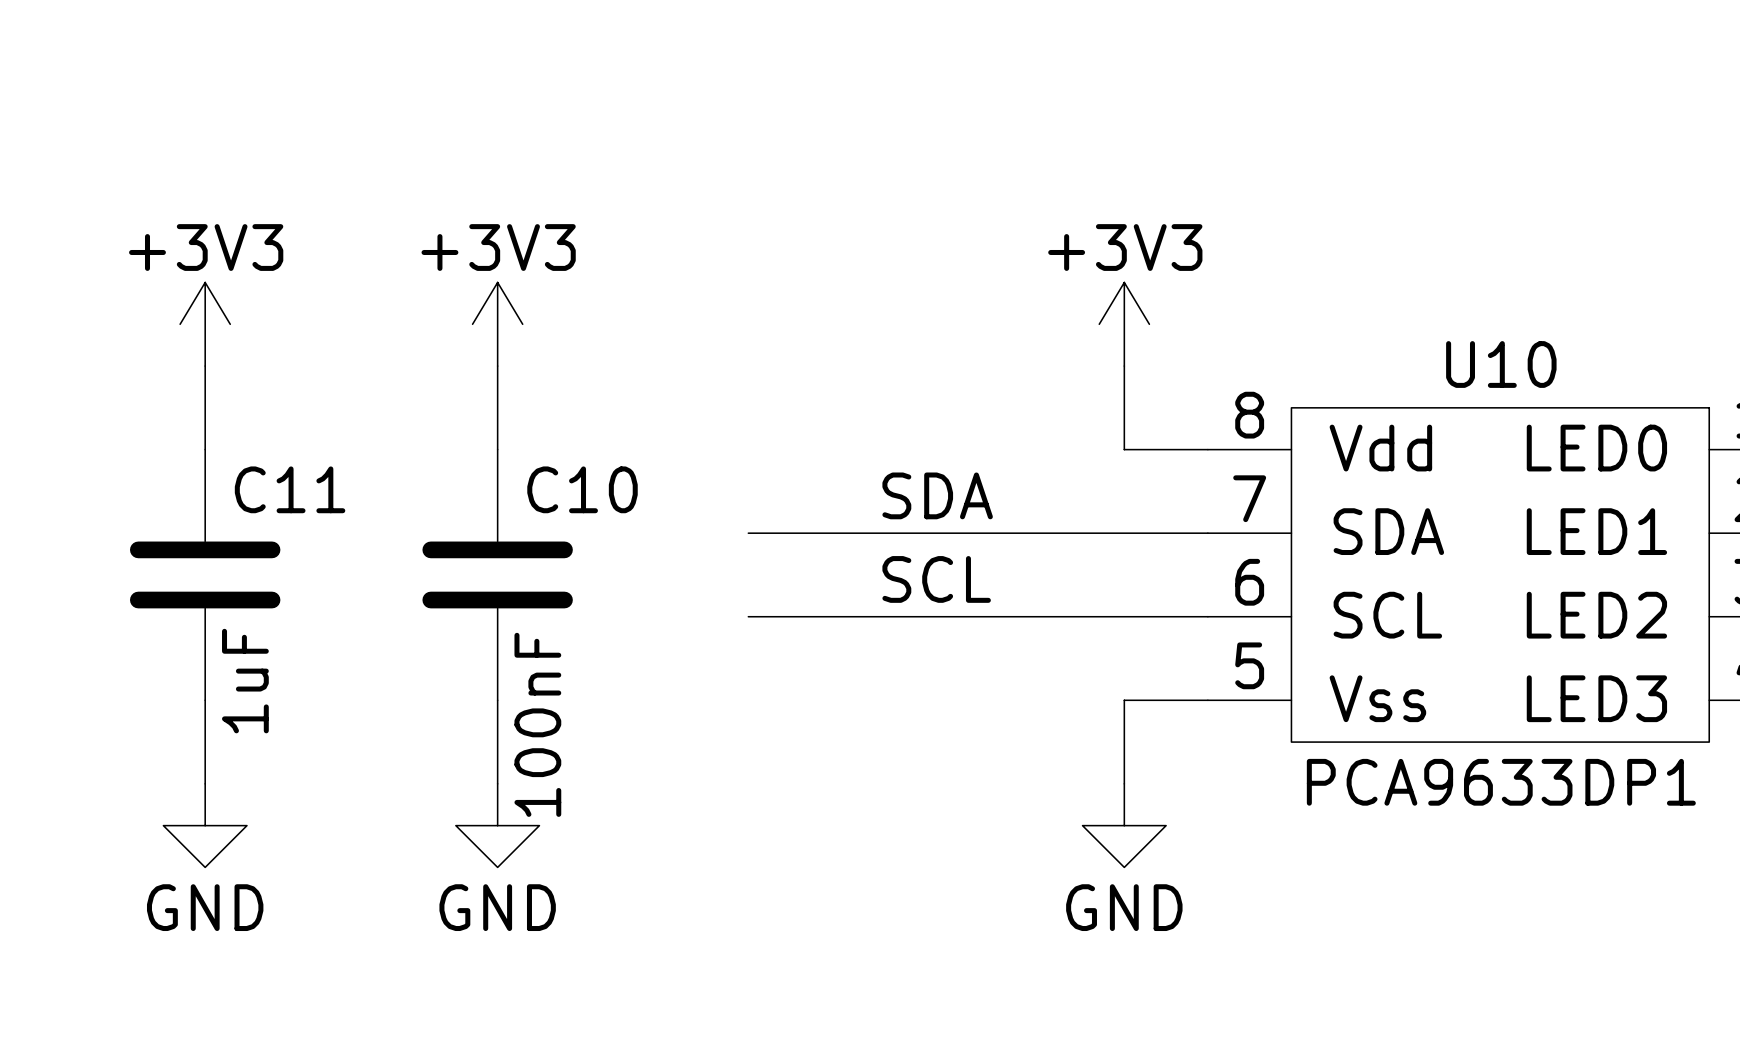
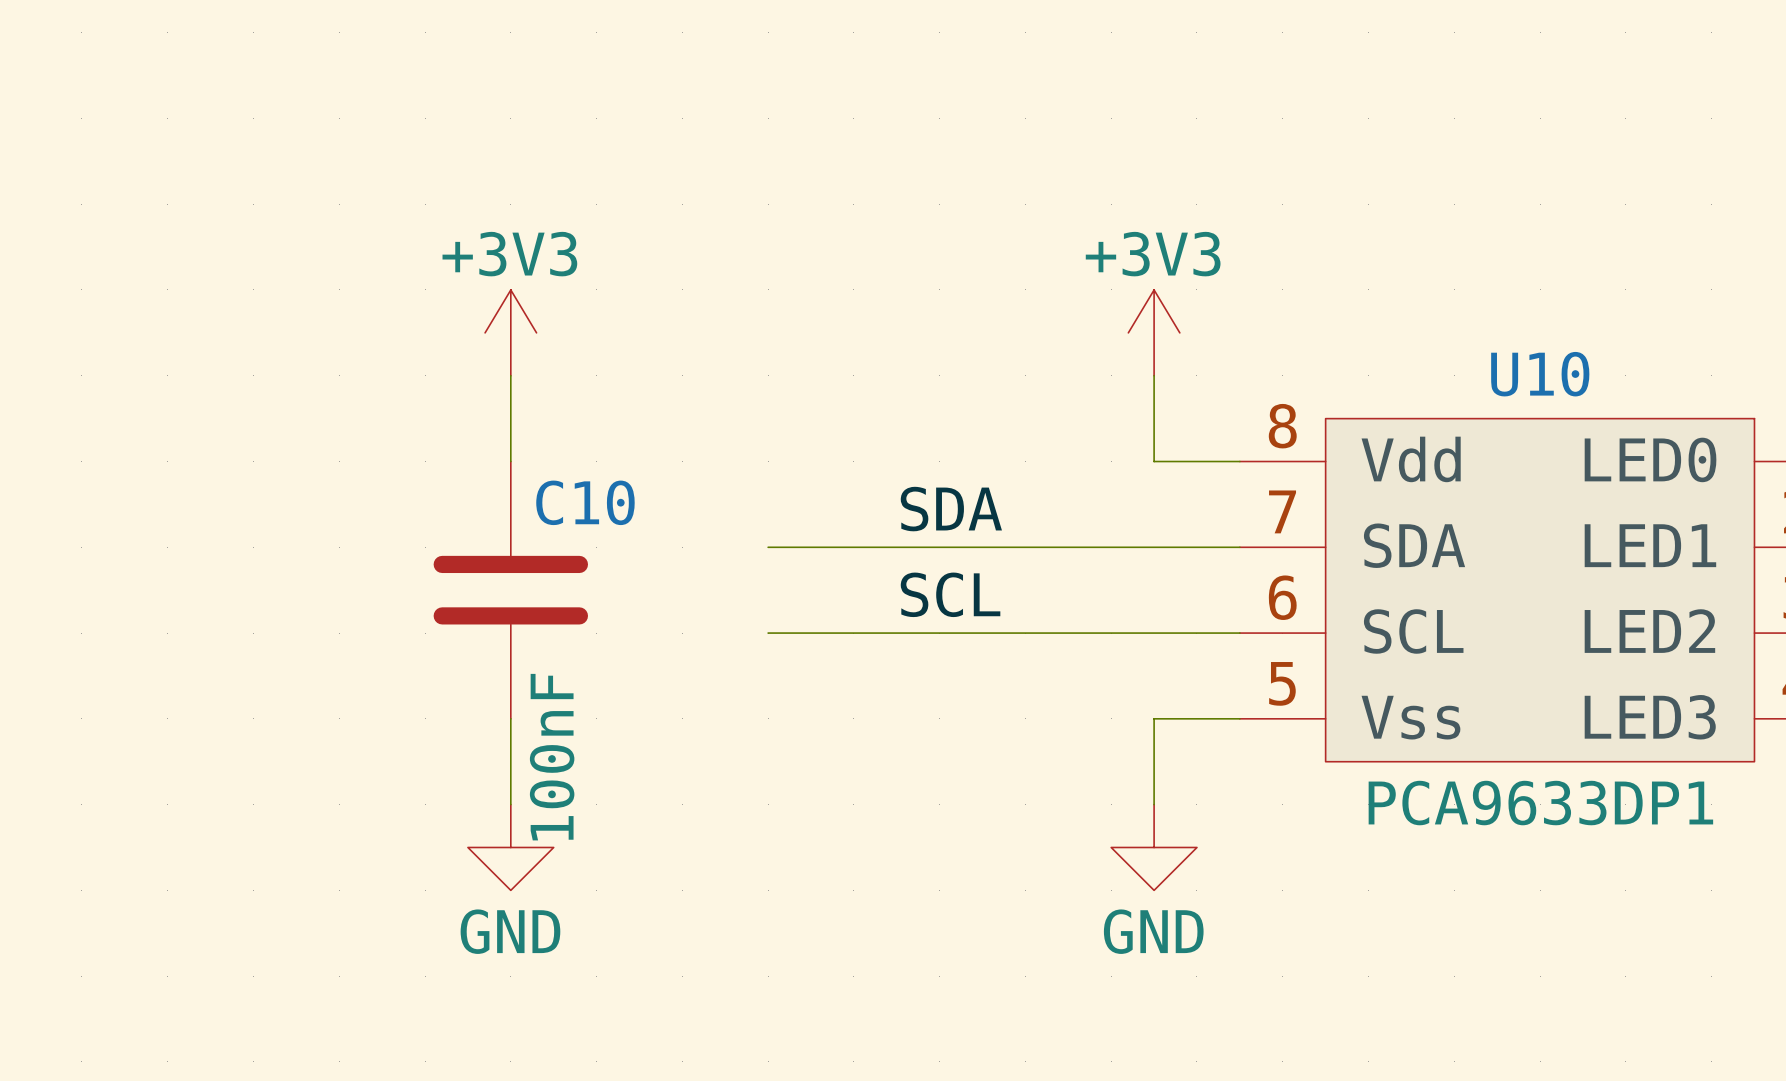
power symbol: +3V3 (205, 324) -> none
wire: (205, 366) (205, 449) -> none
C11: 1uF (205, 574) -> none
wire: (205, 700) (205, 783) -> none
power symbol: GND (205, 825) -> none

